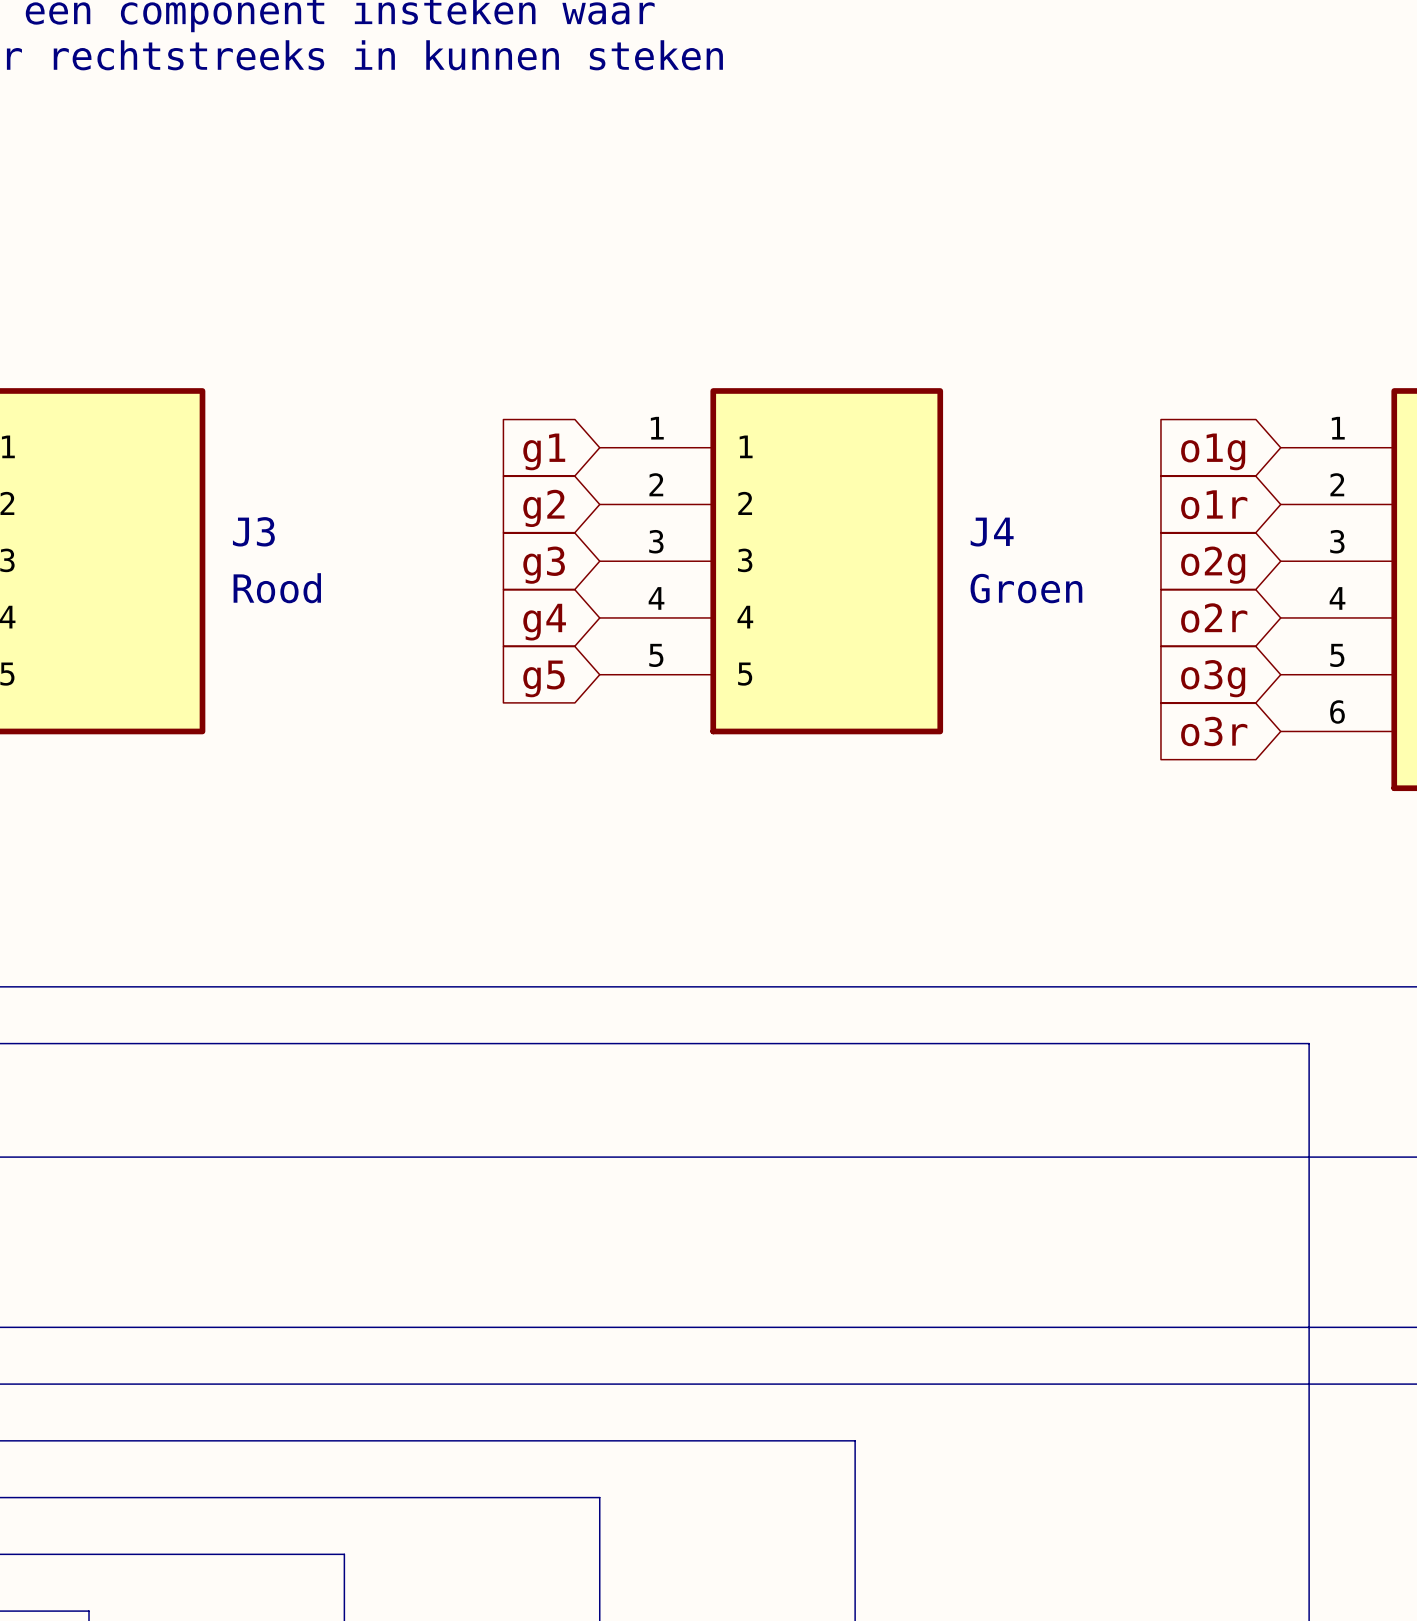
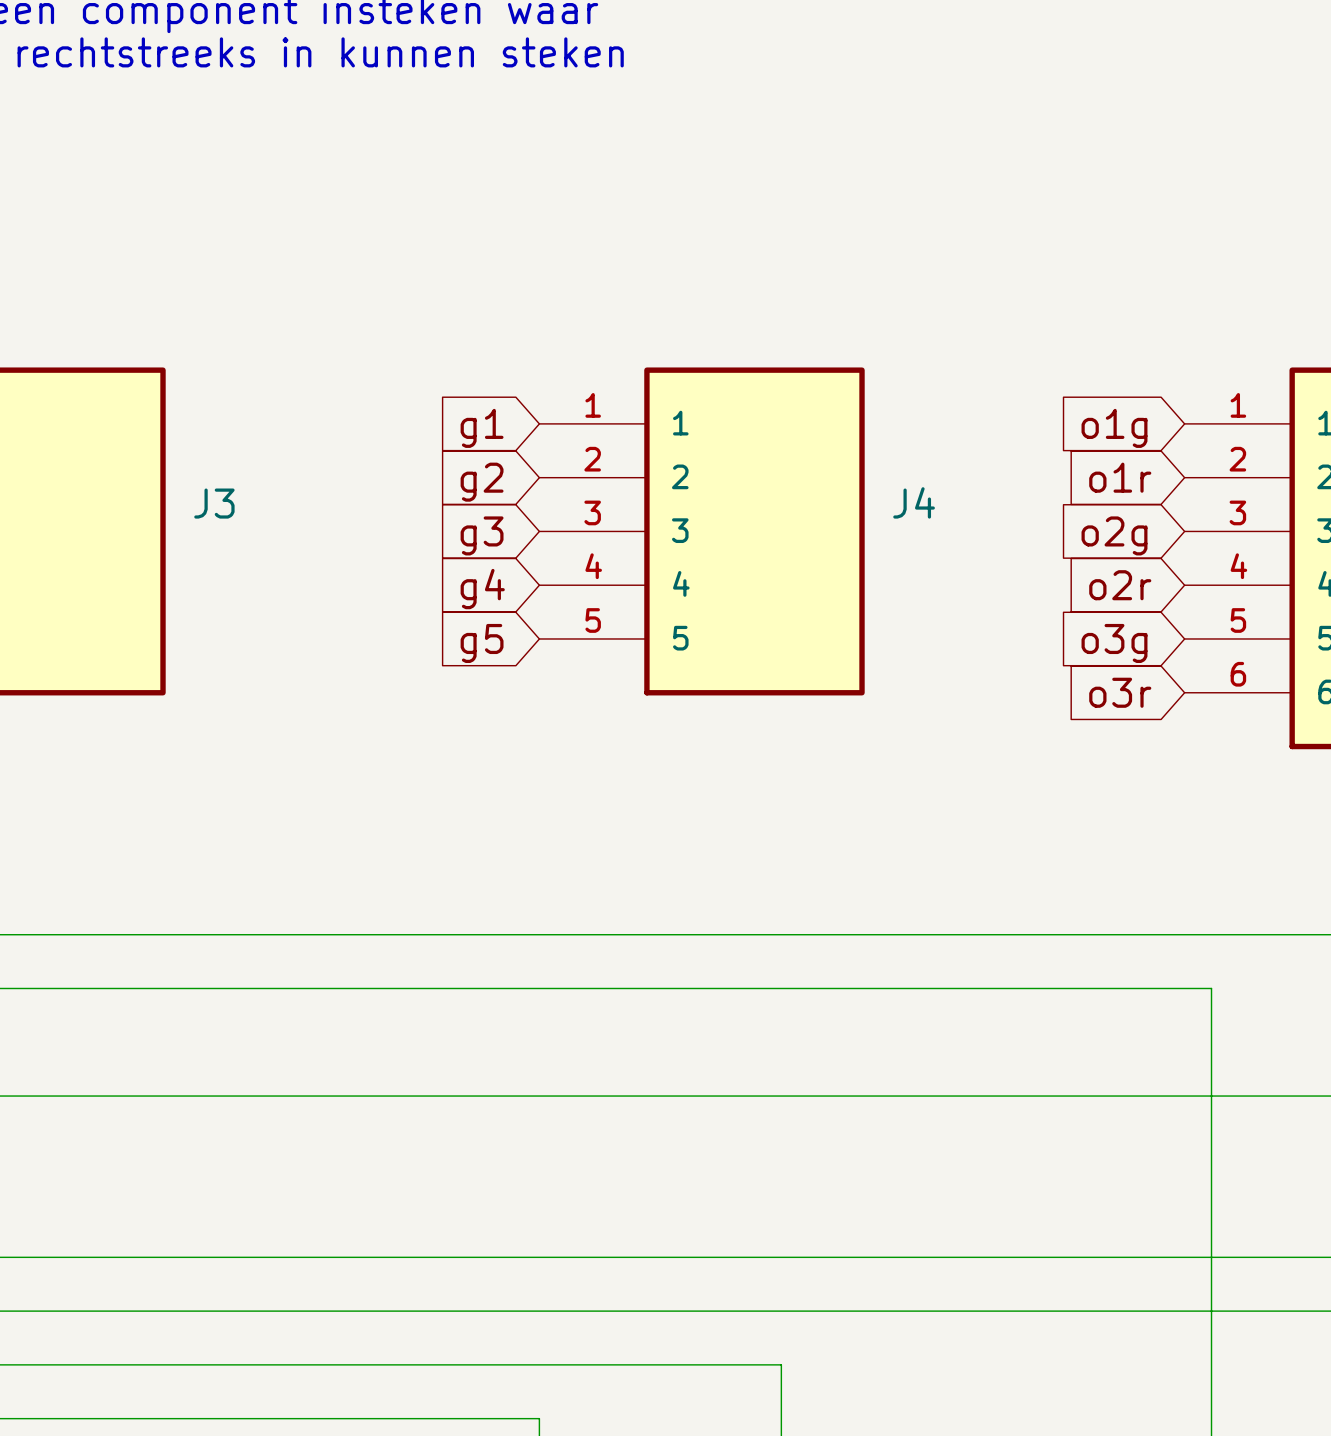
J3 value: Rood (277, 588) -> none
J4 value: Groen (1026, 588) -> none

